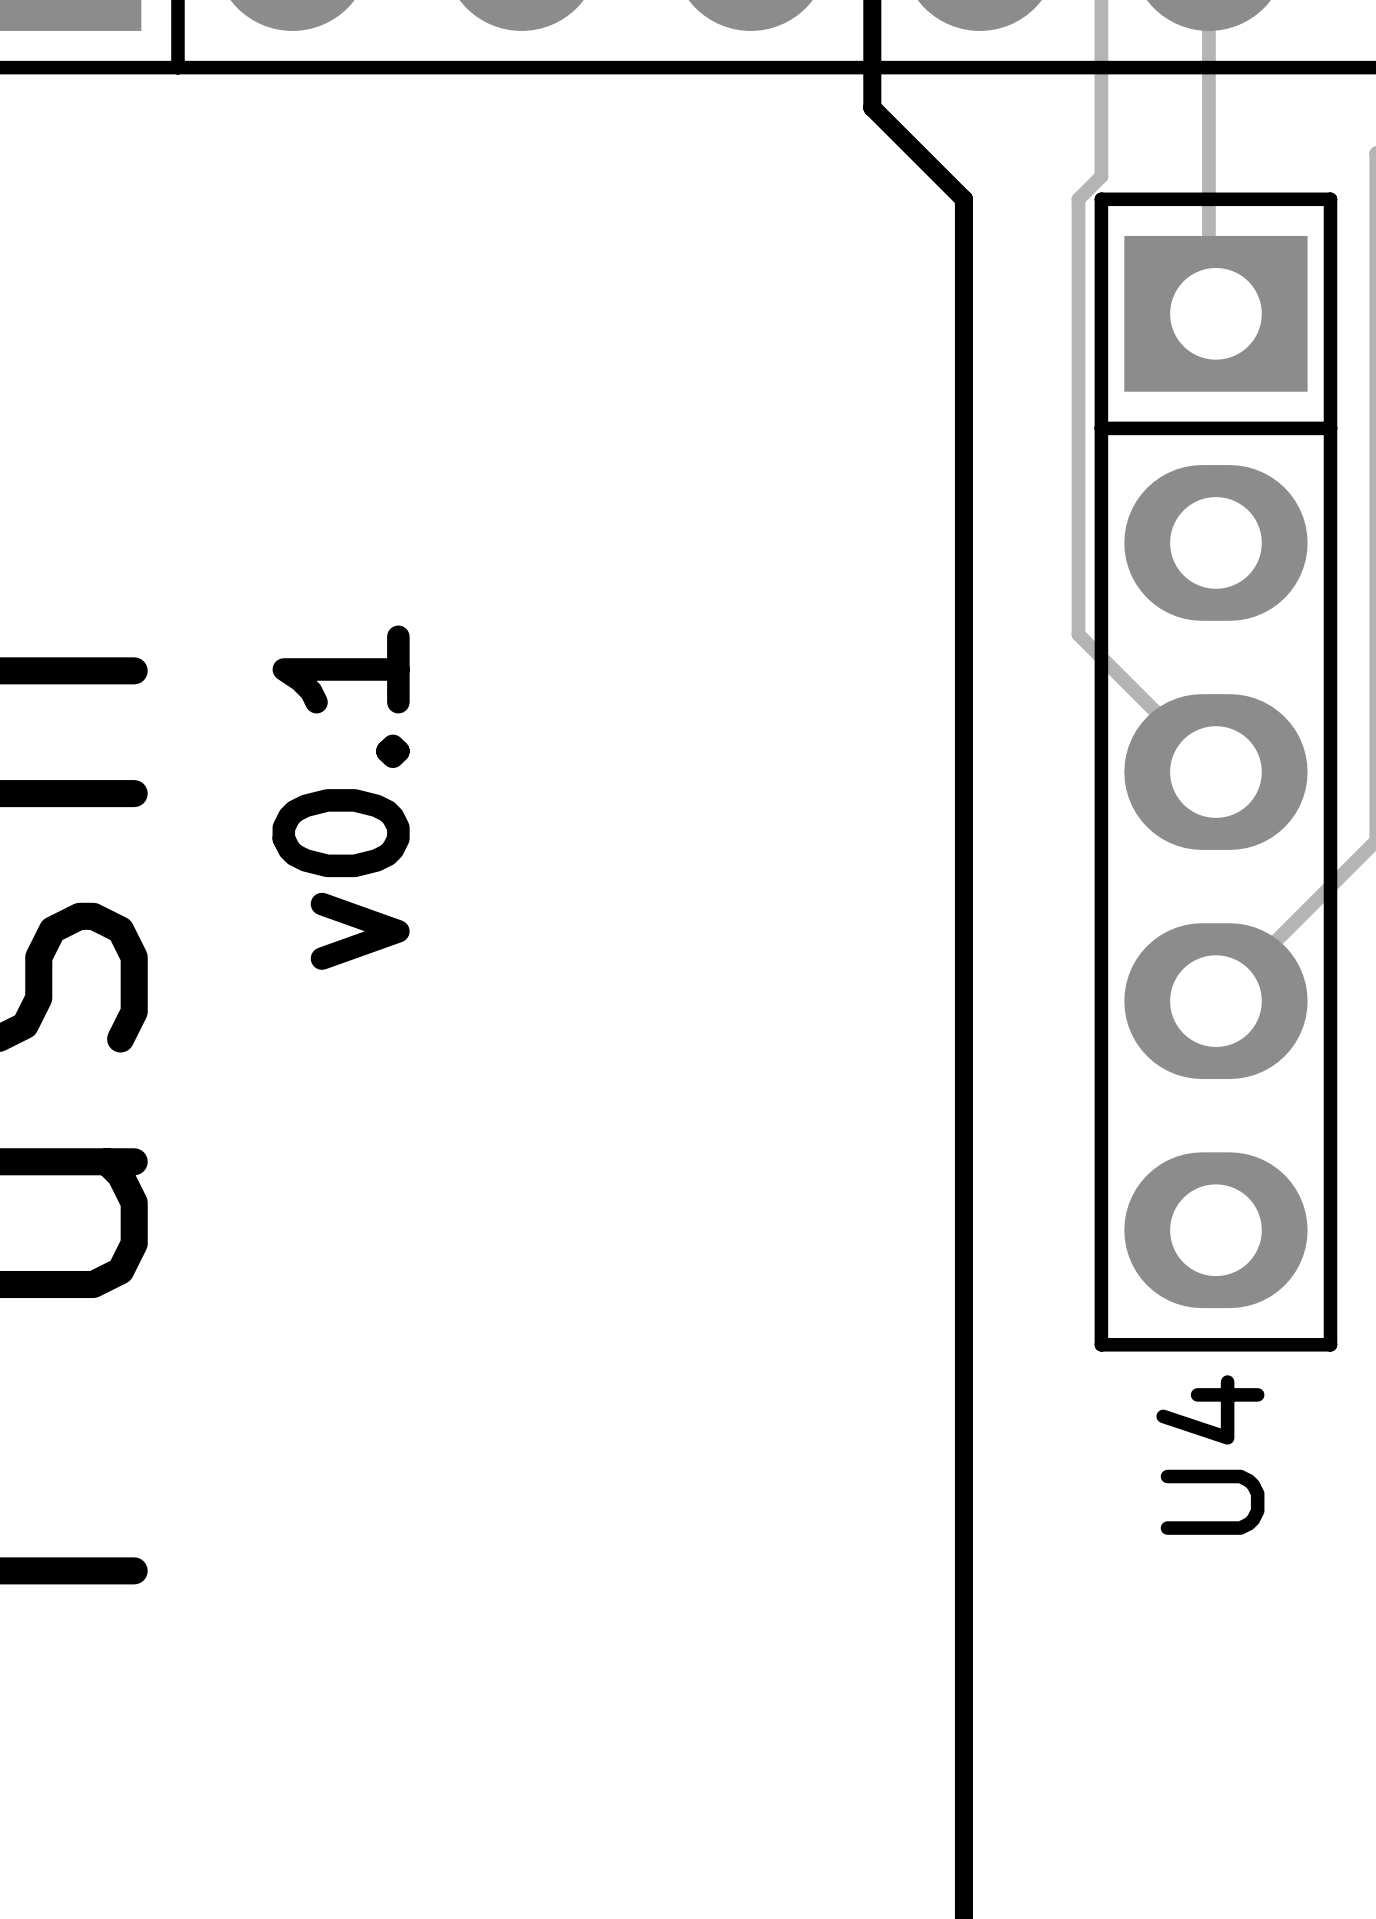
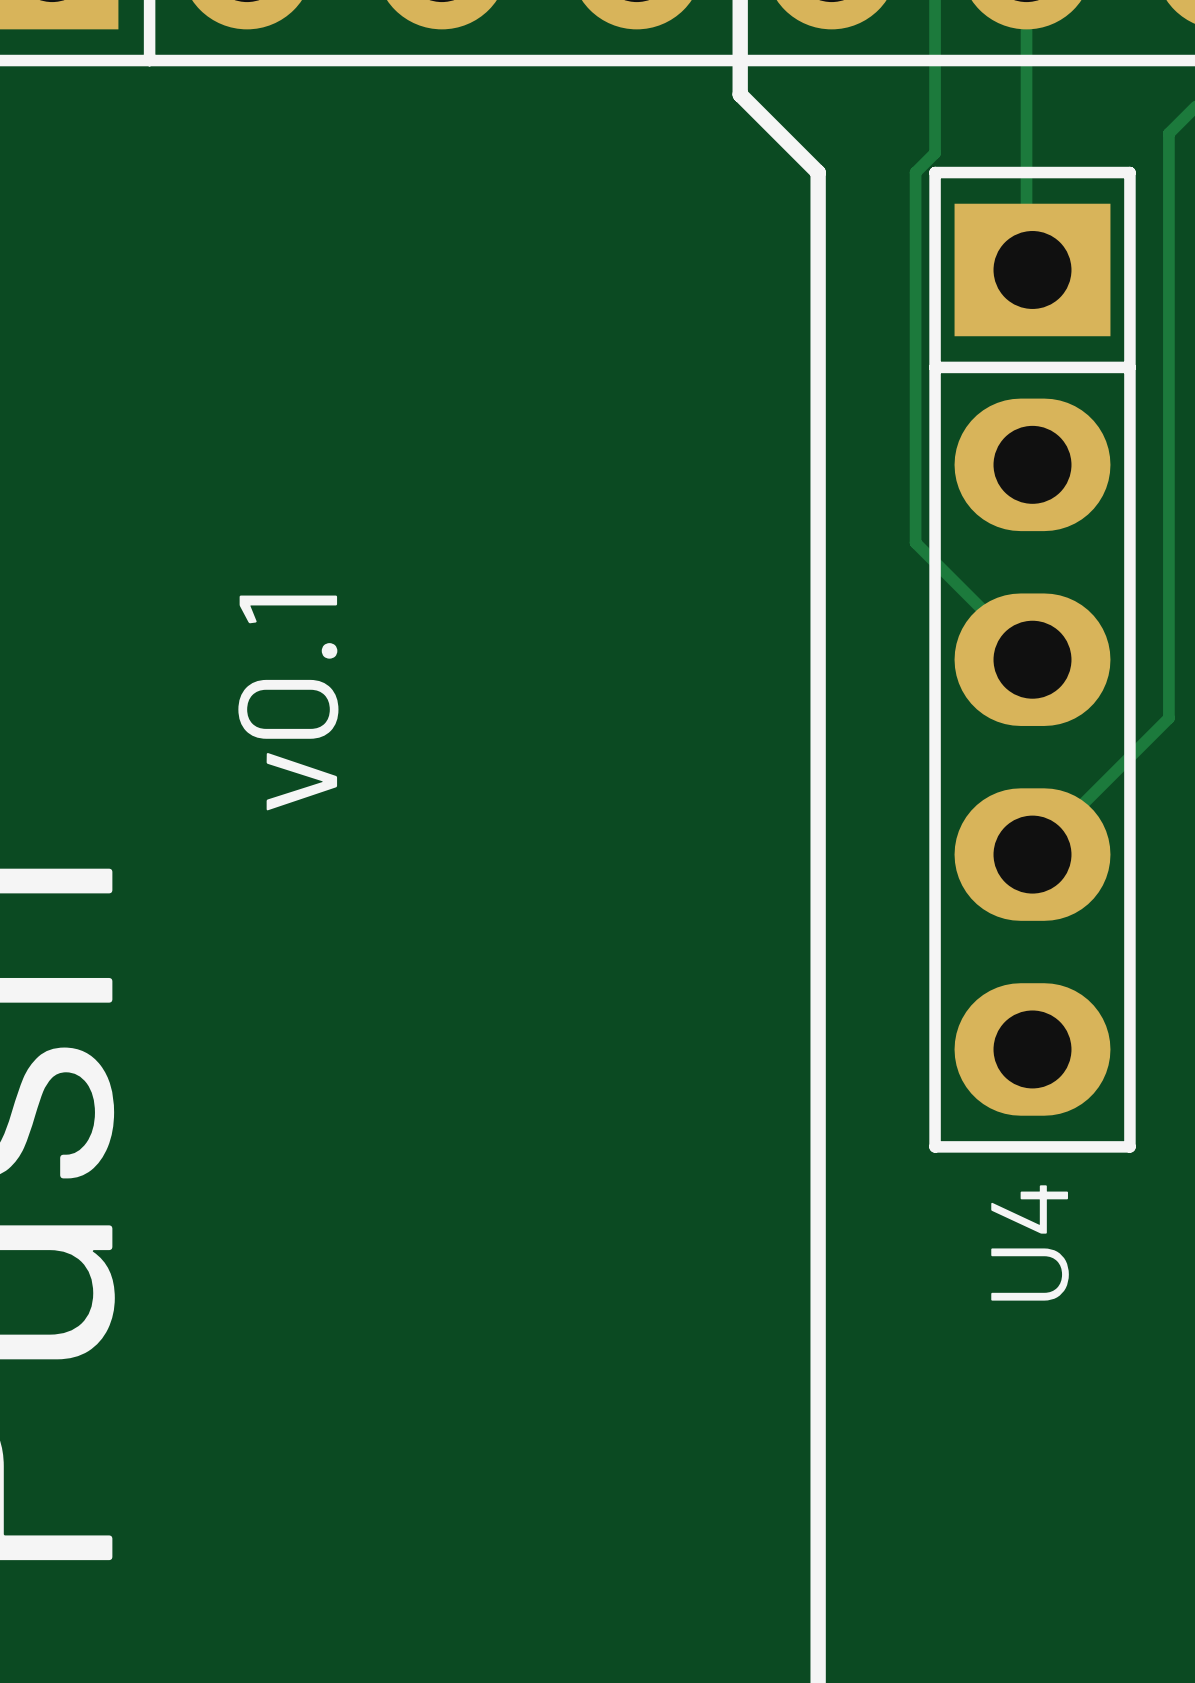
text position: v0.1 (341, 797) -> v0.1 (288, 702)

